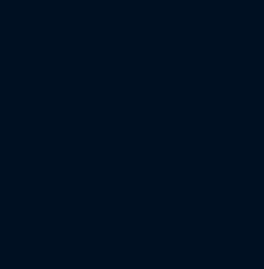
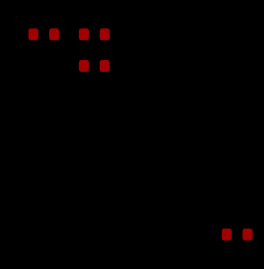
part: none -> (43, 34)
part: none -> (94, 34)
part: none -> (94, 65)
part: none -> (237, 234)

